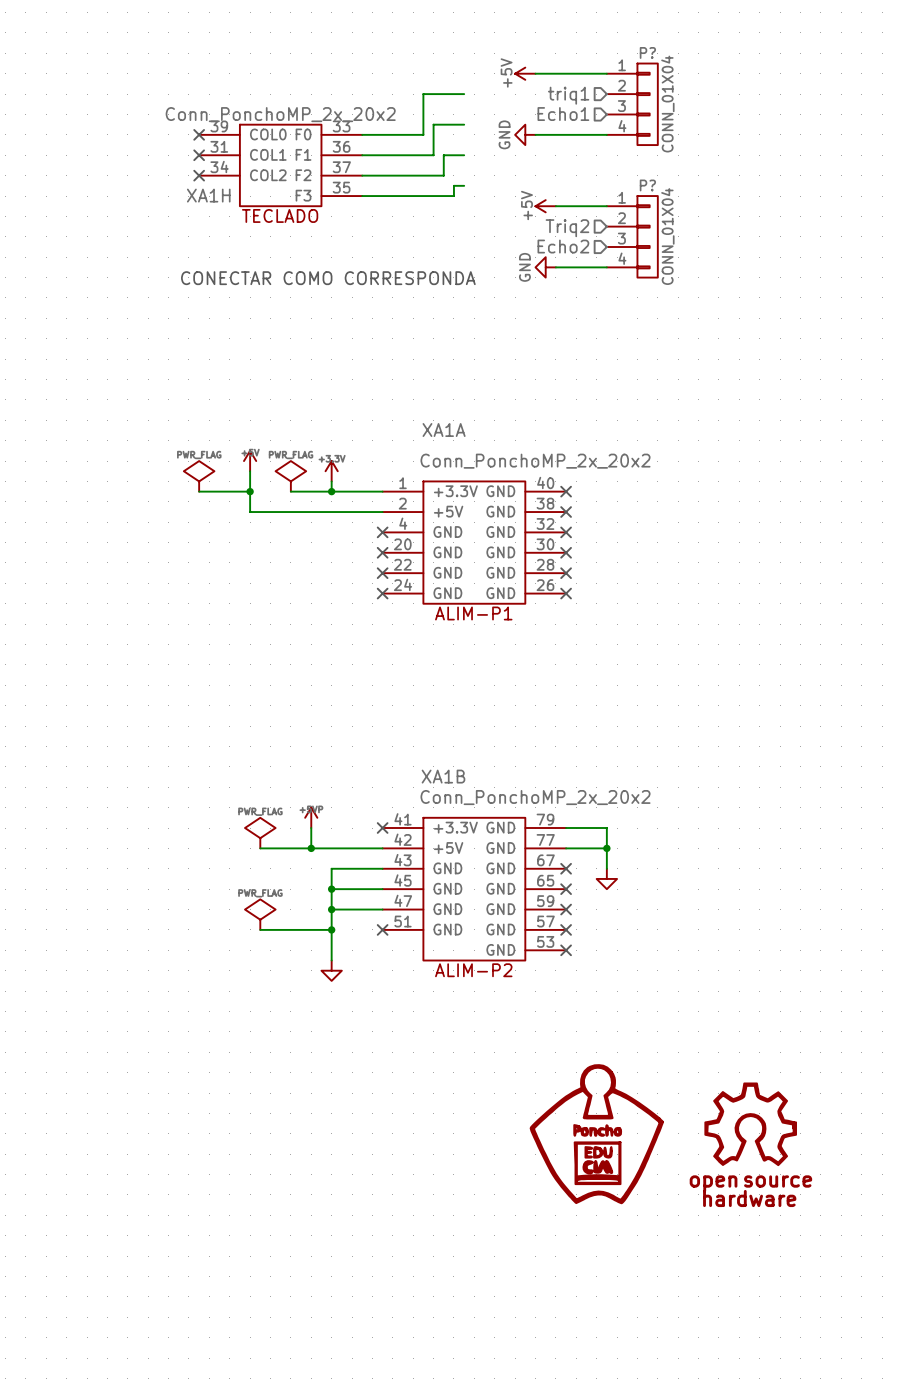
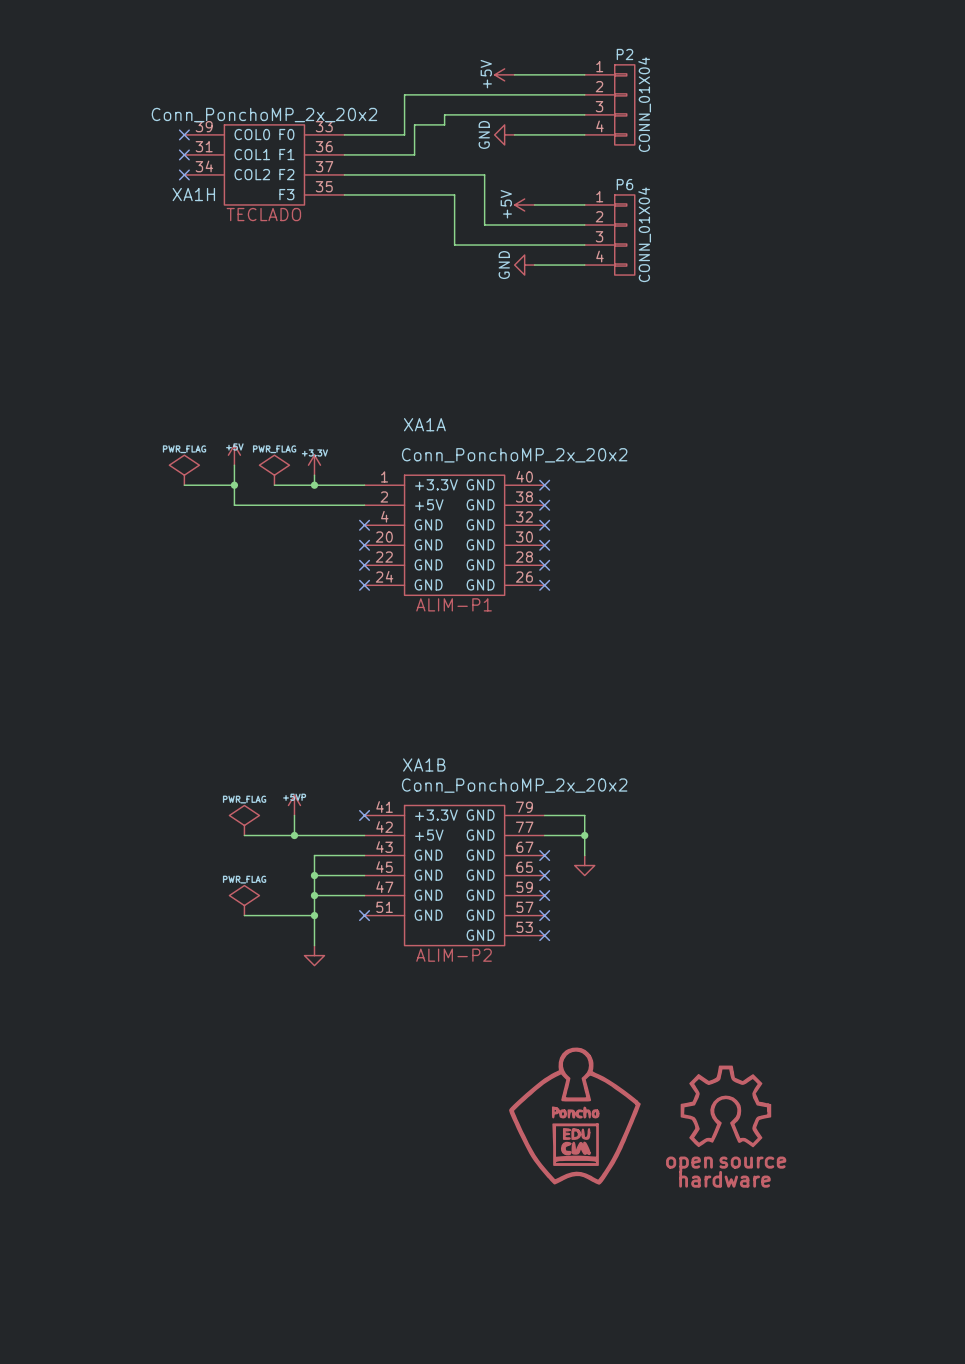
P? name: P? (647, 52) -> P2 (624, 54)
wire: none -> (444, 94) (584, 94)
hierarchical label: triq1 (568, 95) -> none
hierarchical label: Echo1 (563, 114) -> none
wire: none -> (584, 114) (444, 114) (444, 124)
wire: (464, 155) (443, 155) (443, 175) -> (584, 225) (484, 225) (484, 174) (424, 174)
wire: (464, 185) (453, 185) (453, 196) -> (584, 245) (454, 245) (454, 194) (434, 194)
P? name: P? (647, 185) -> P6 (624, 184)
hierarchical label: Triq2 (567, 228) -> none
hierarchical label: Echo2 (563, 246) -> none
text: CONECTAR COMO CORRESPONDA (328, 278) -> none

